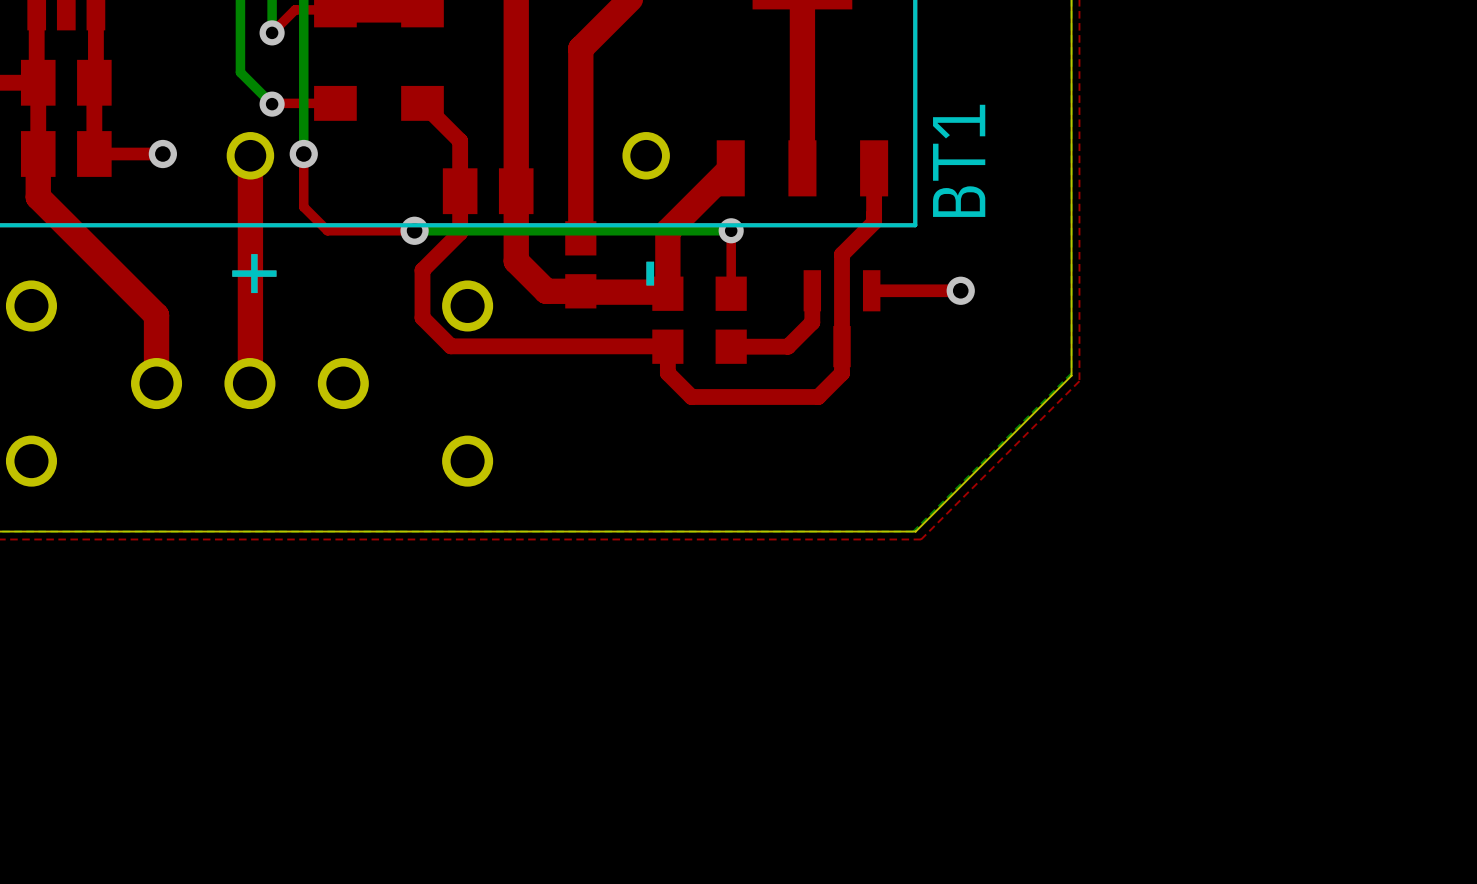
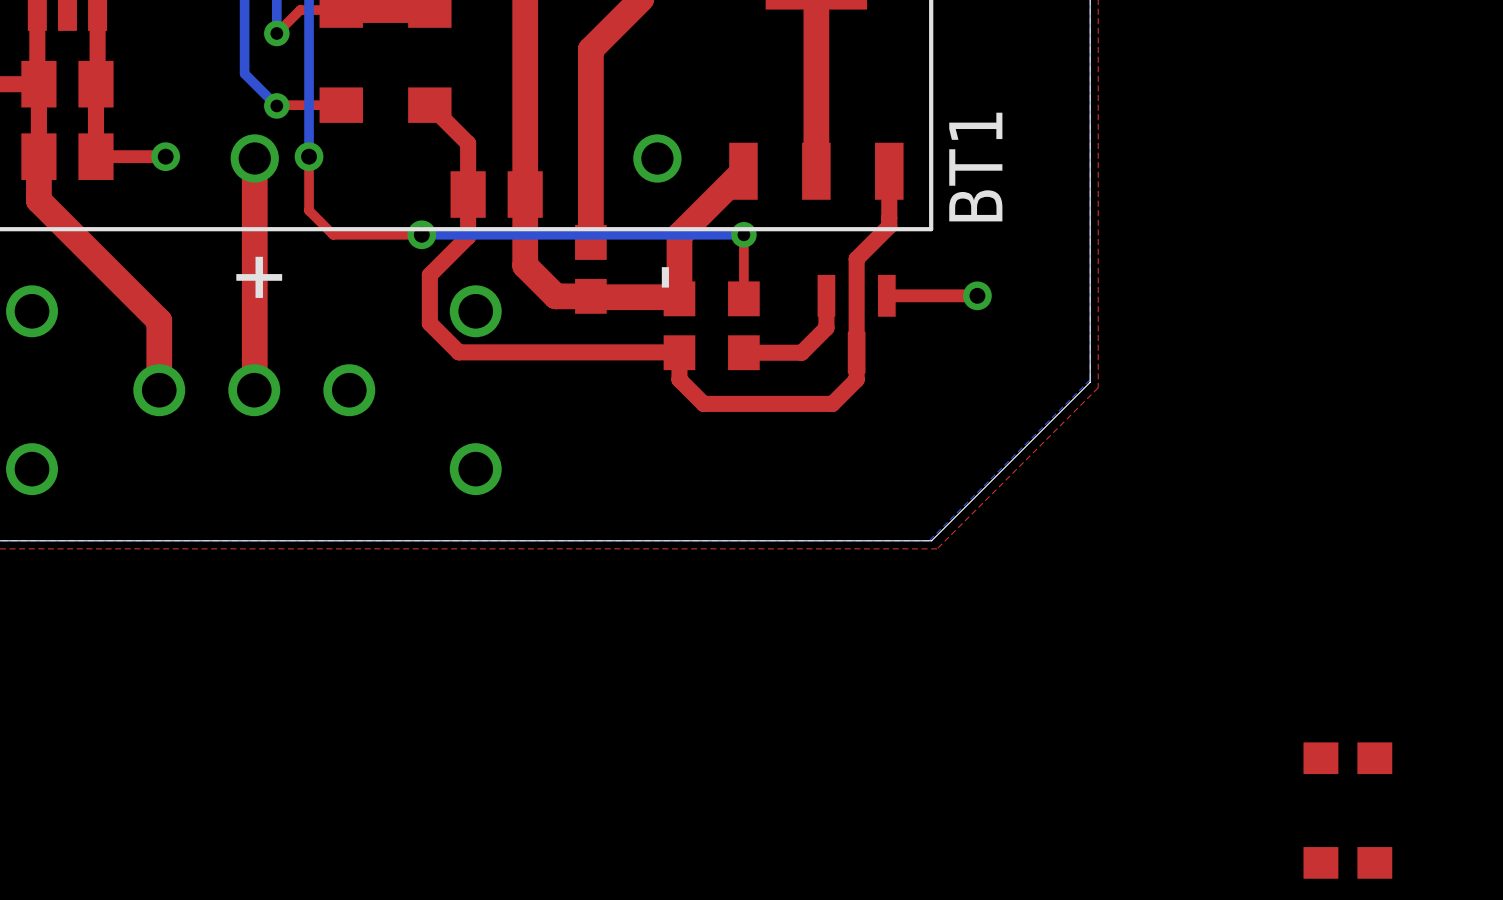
part: none -> (1347, 758)
part: none -> (1347, 862)

